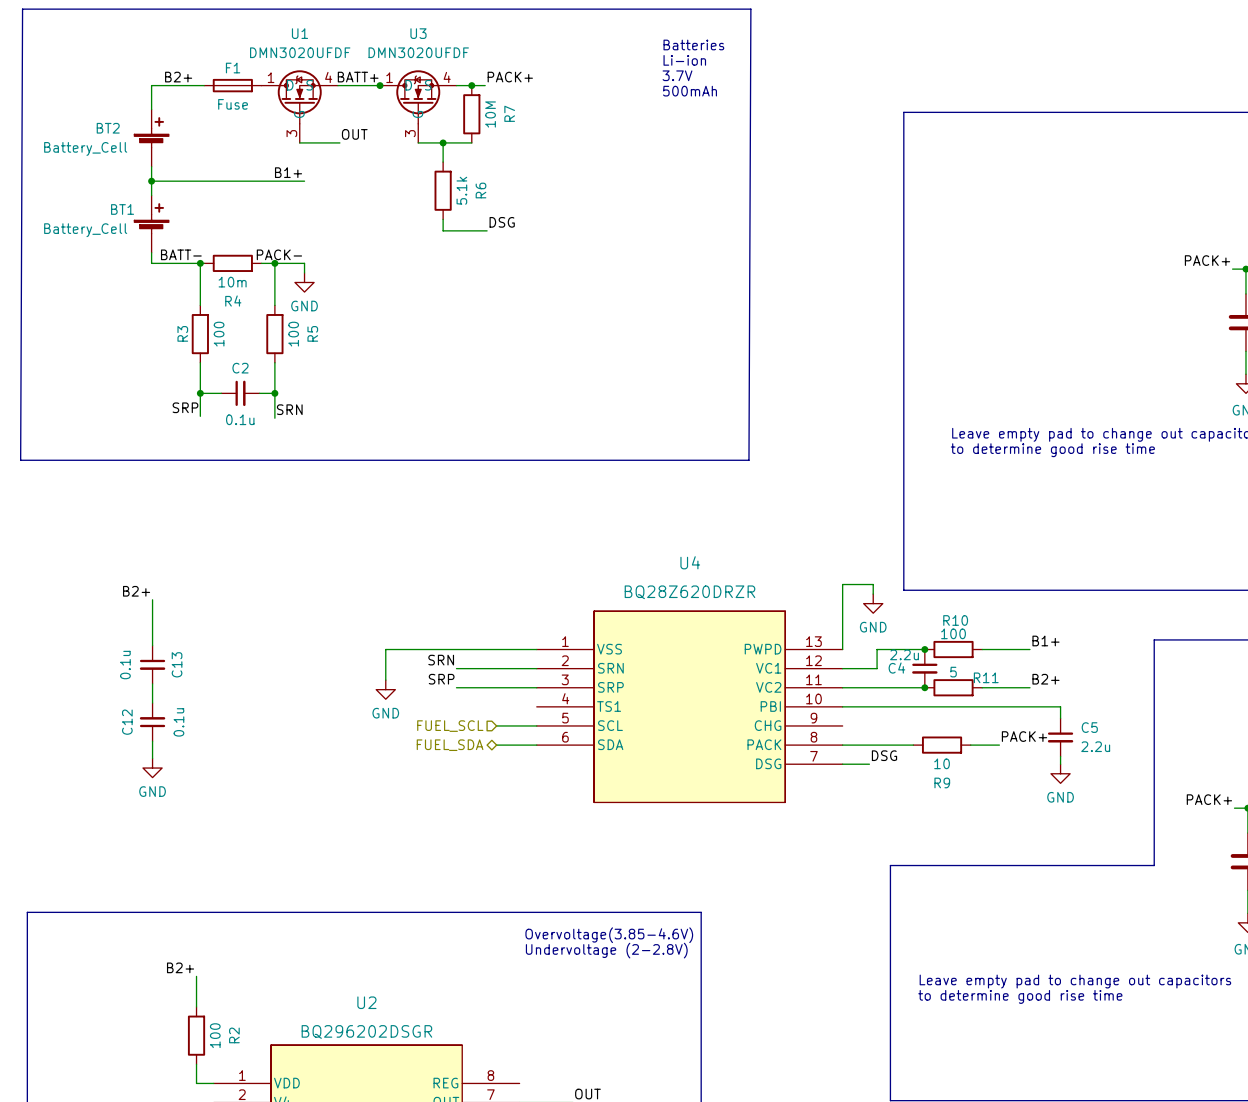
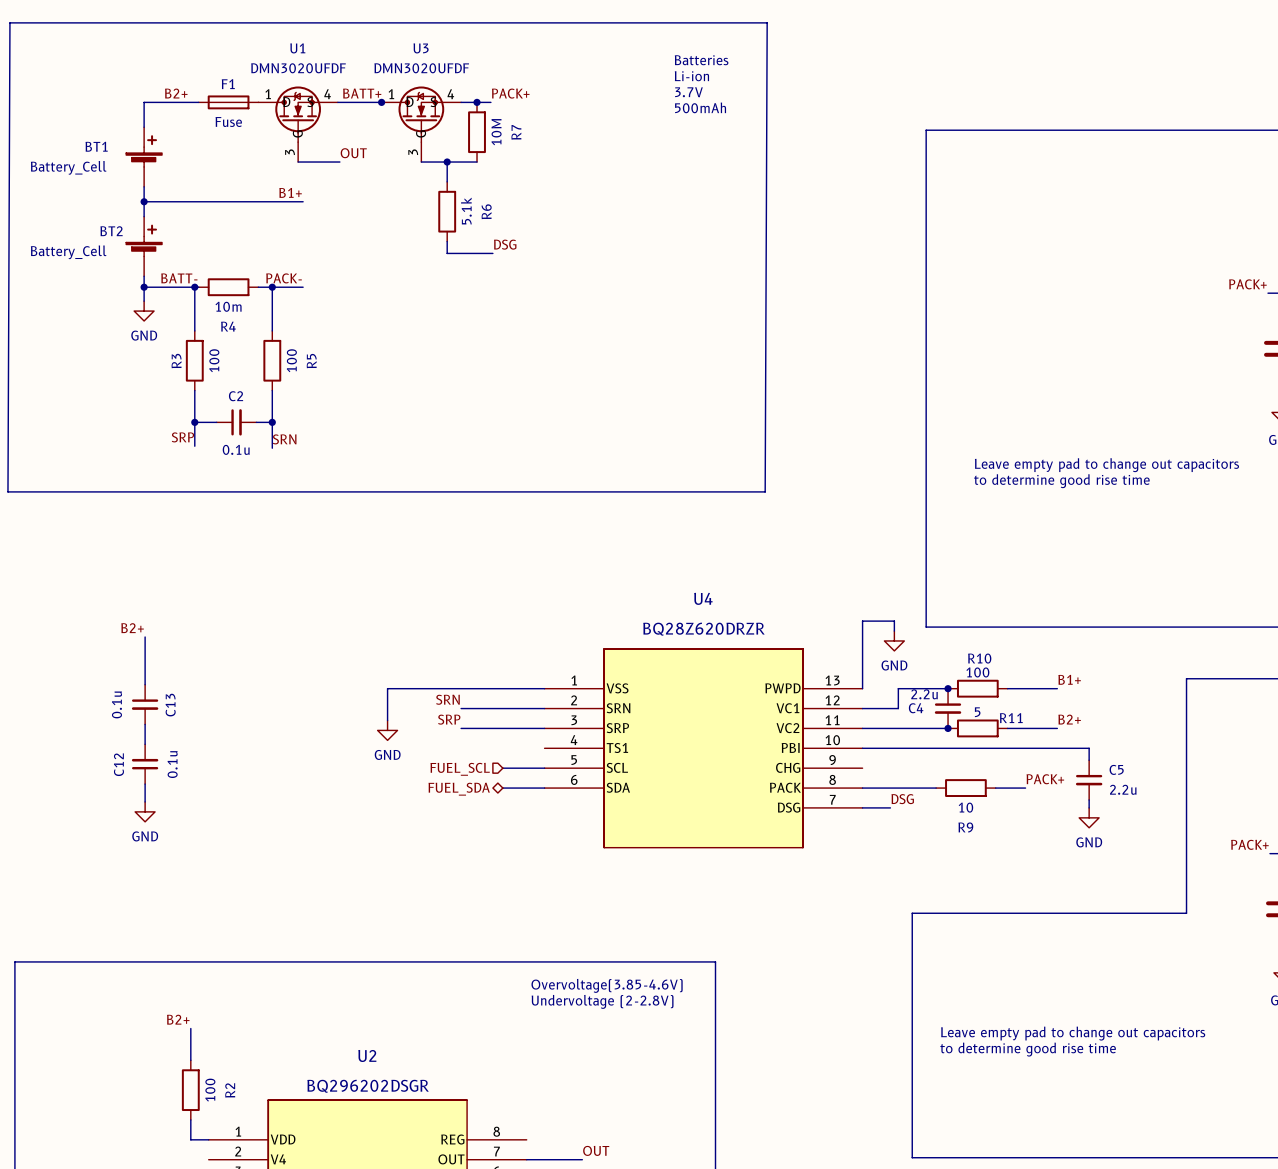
BT2 name: BT2 (108, 128) -> BT1 (96, 146)
BT1 name: BT1 (122, 209) -> BT2 (111, 231)
wire: none -> (144, 287) (144, 301)
junction: none -> (144, 287)
wire: (304, 263) (304, 272) -> none
power symbol position: GND (304, 282) -> GND (144, 311)

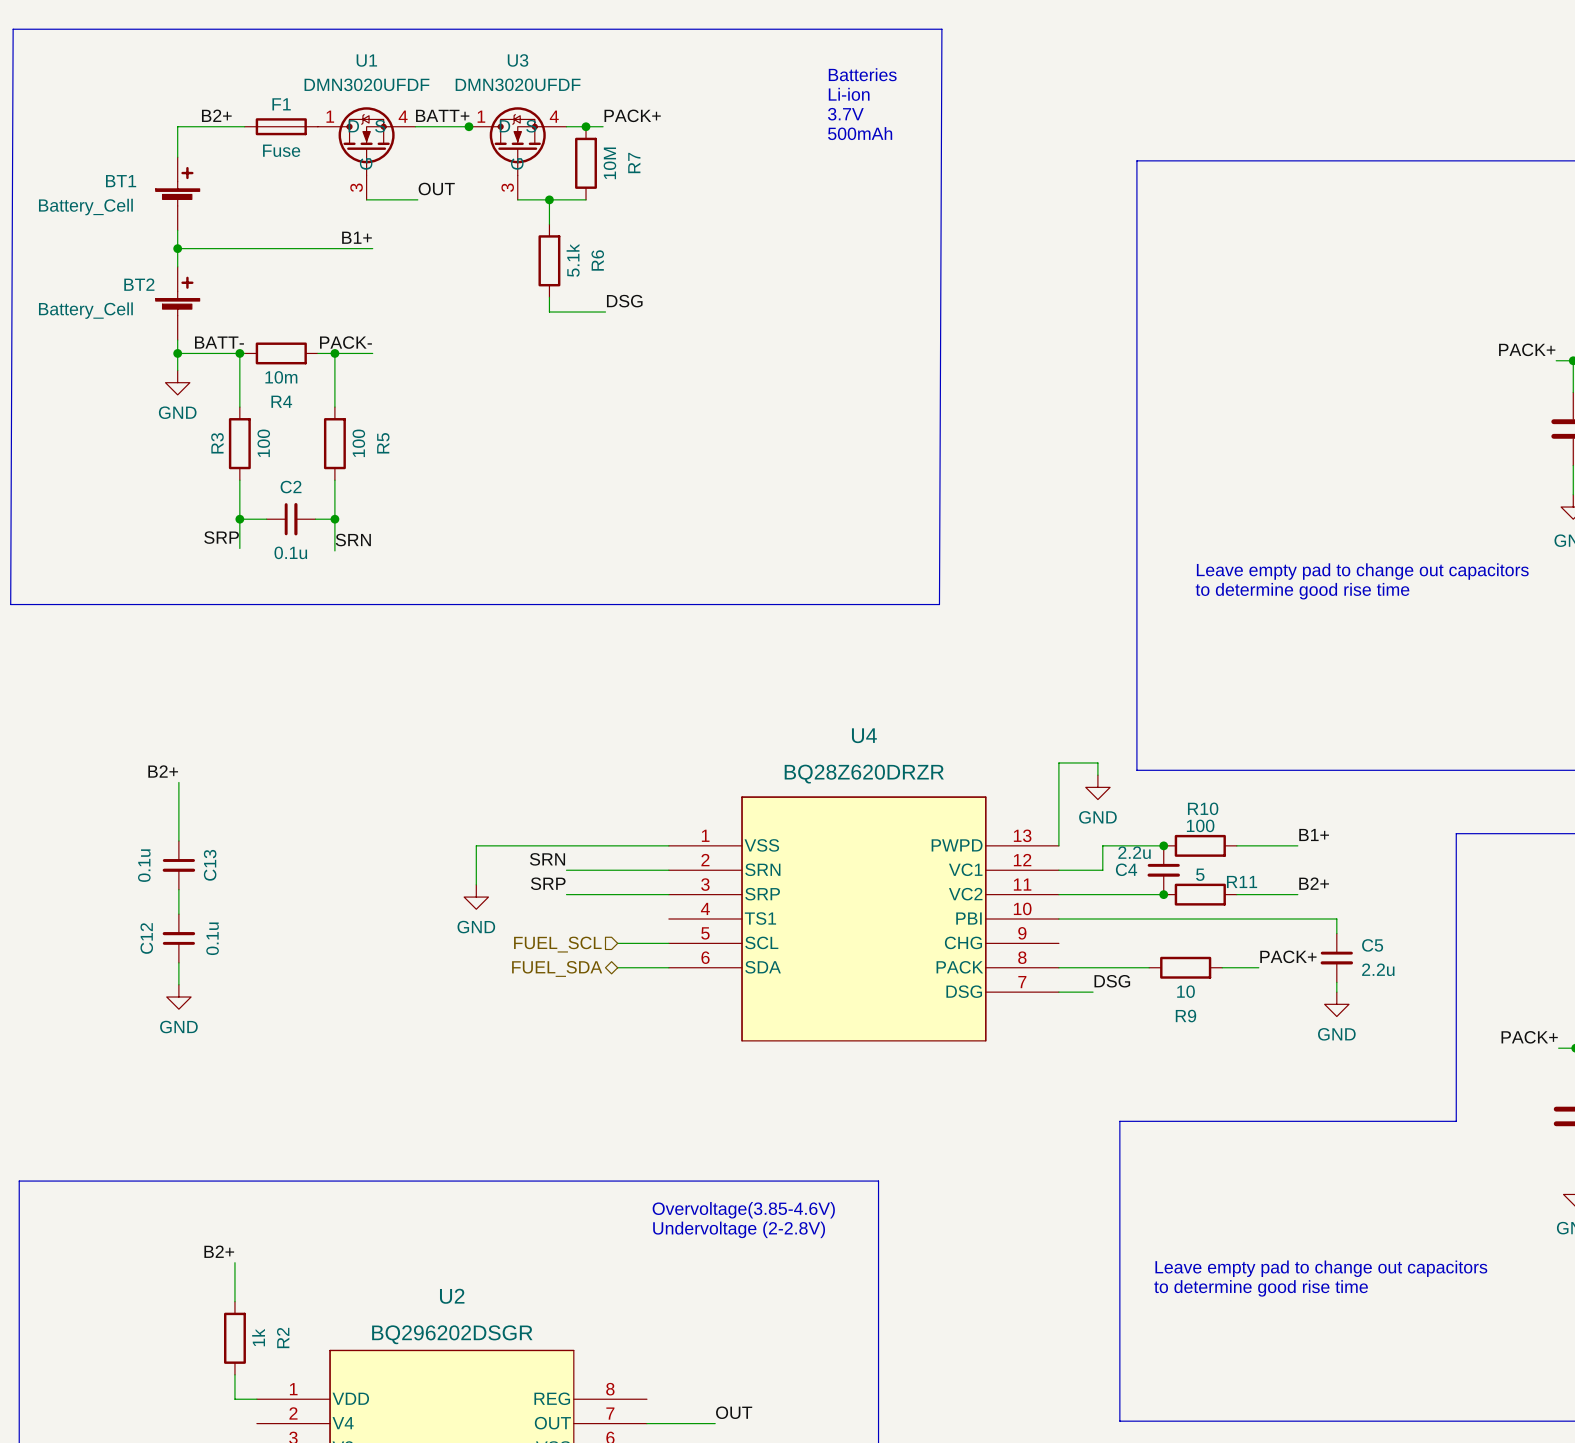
R2 value: 100 (210, 1090) -> 1k (258, 1337)

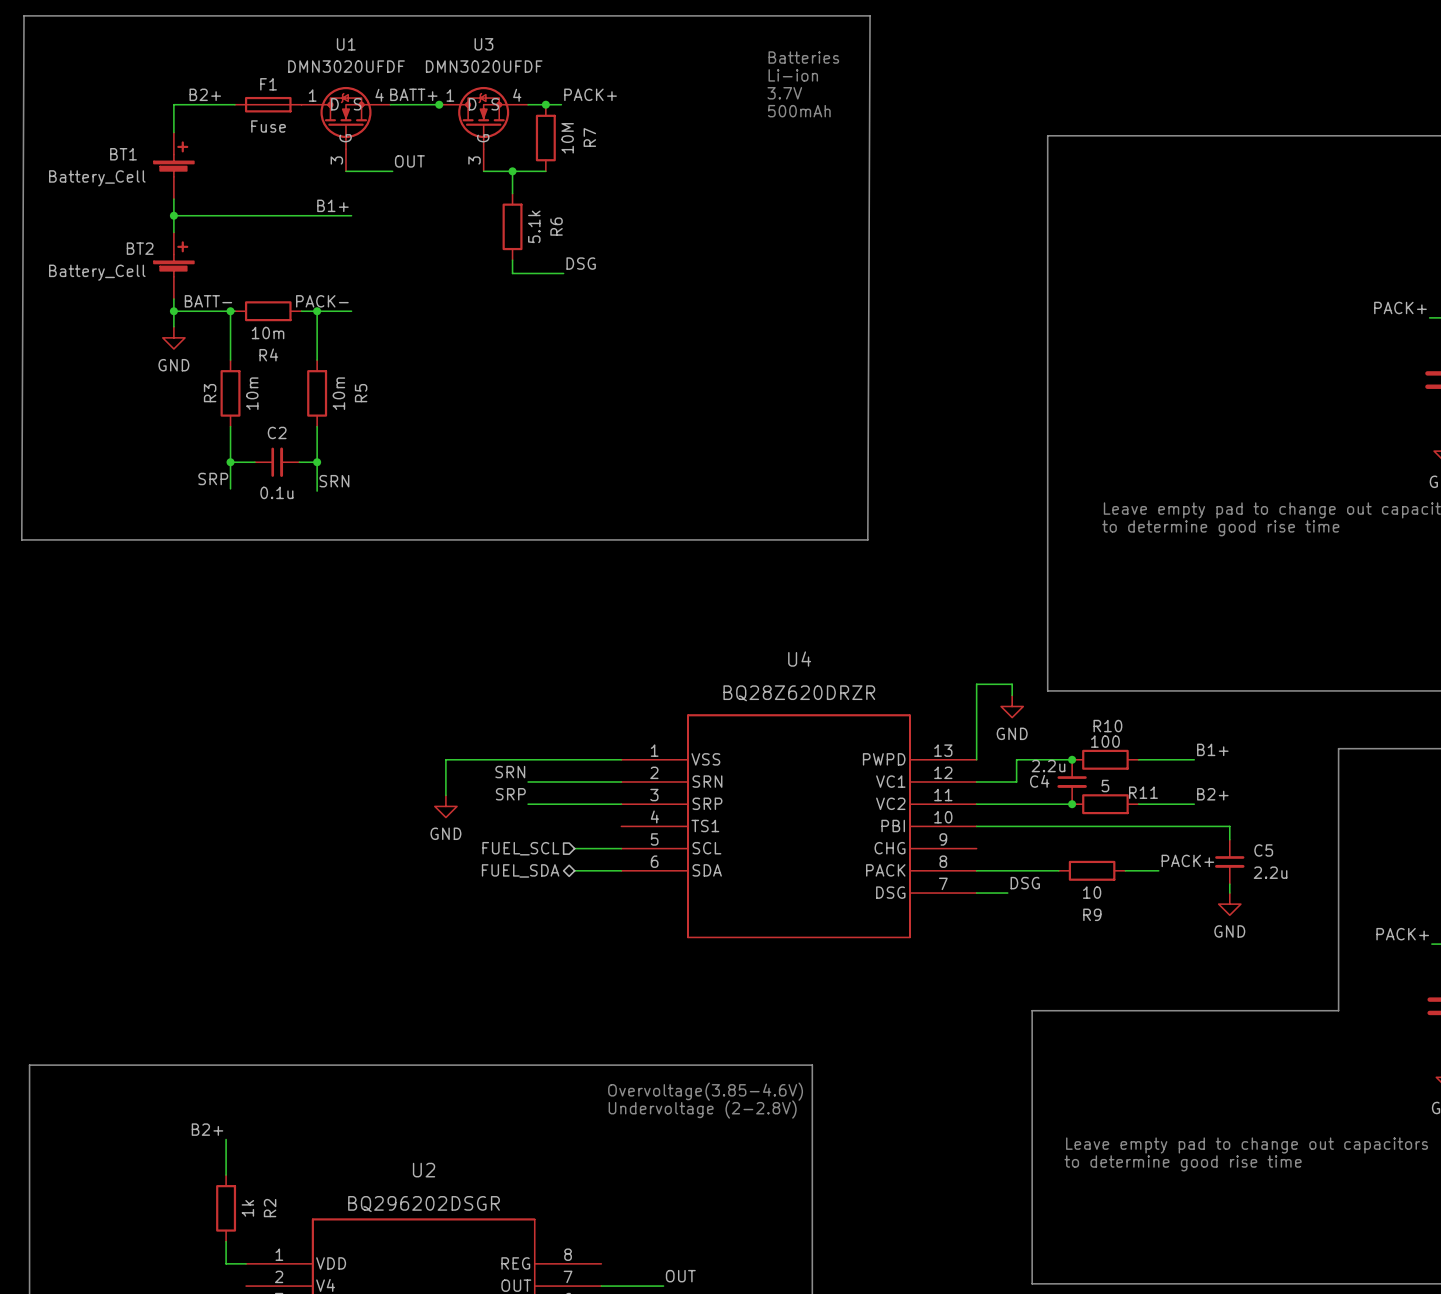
R3 value: 100 (263, 443) -> 10m (252, 393)
R5 value: 100 (358, 443) -> 10m (338, 393)
label: B2+ (163, 771) -> none
wire: (178, 782) (178, 840) -> none
C13: 0.1u (178, 865) -> none
wire: (178, 889) (178, 914) -> none
C12: 0.1u (178, 938) -> none
wire: (178, 962) (178, 984) -> none
power symbol: GND (178, 997) -> none

